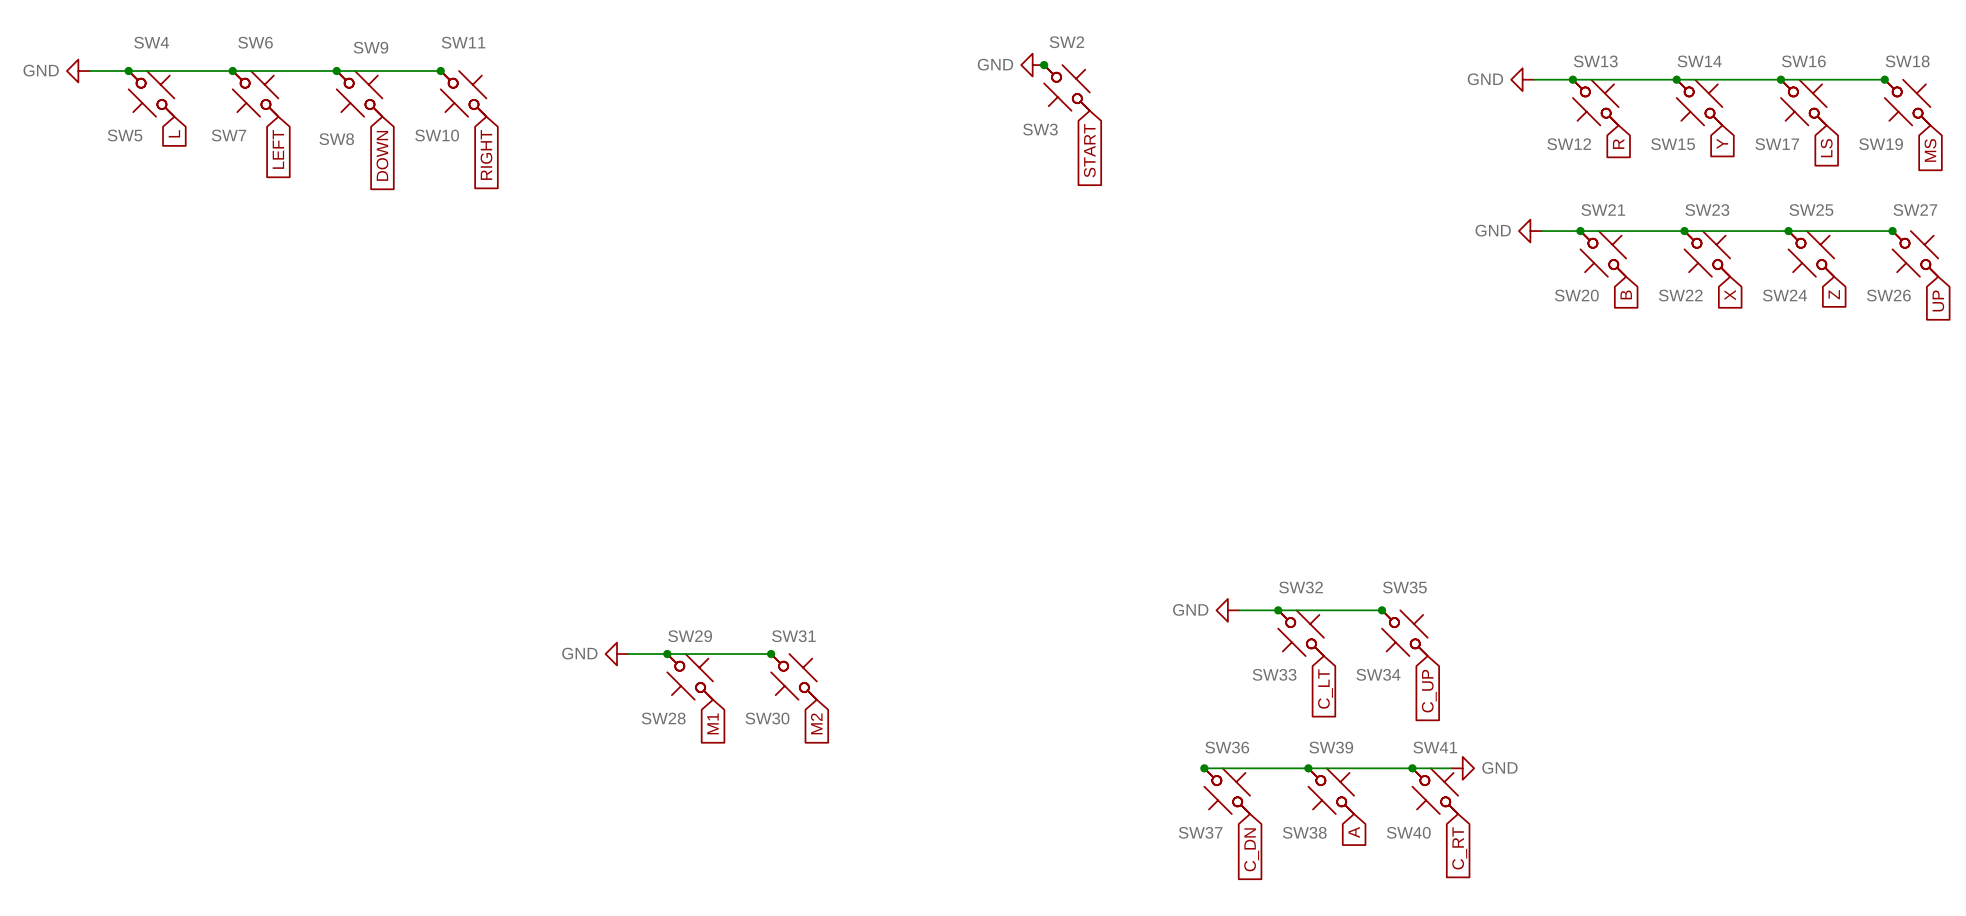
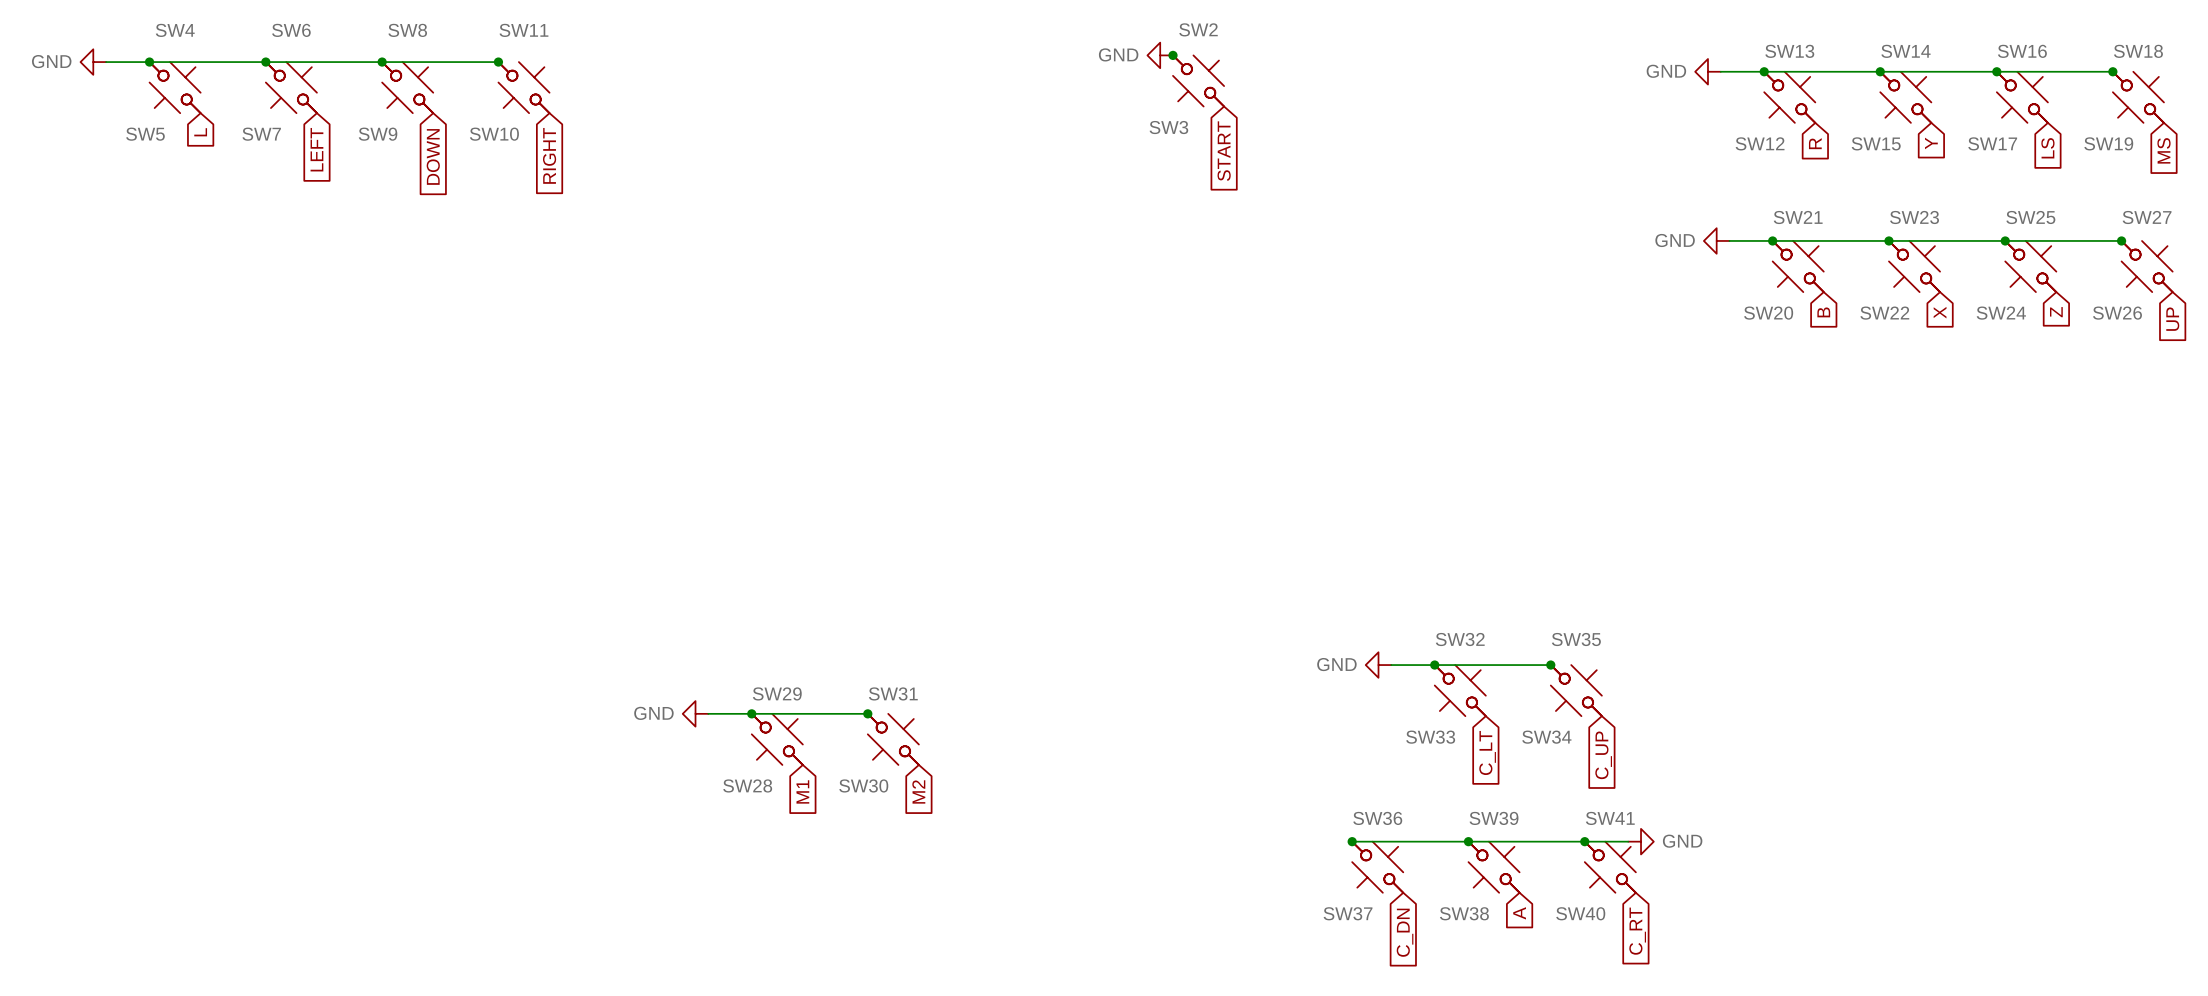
SW9 name: SW9 (370, 47) -> SW8 (407, 30)
SW8 name: SW8 (336, 139) -> SW9 (378, 134)

